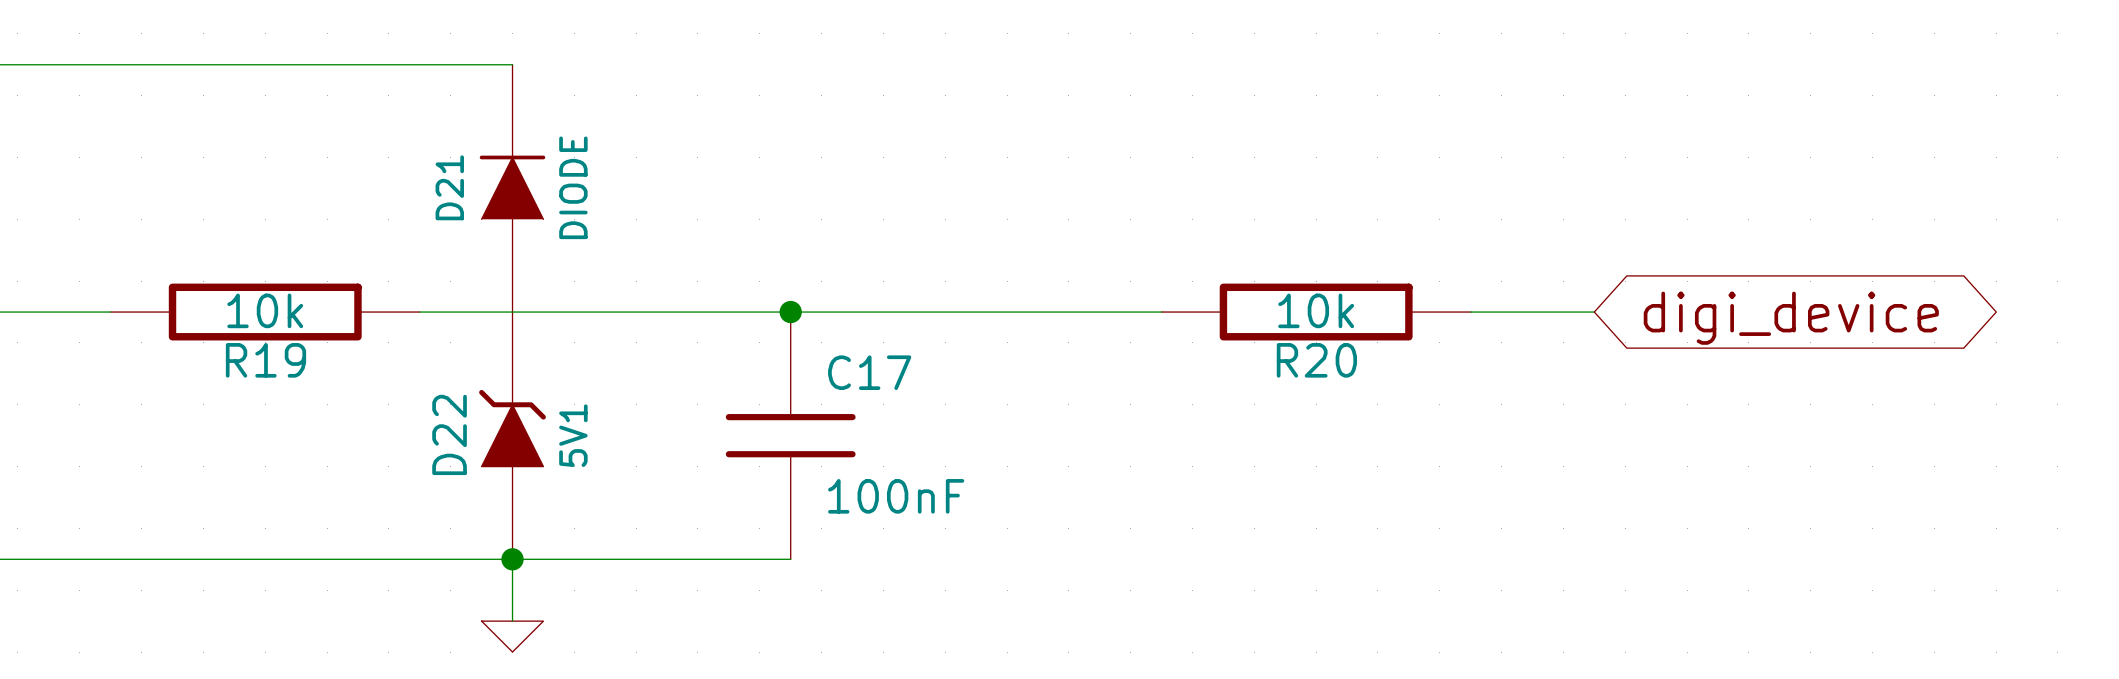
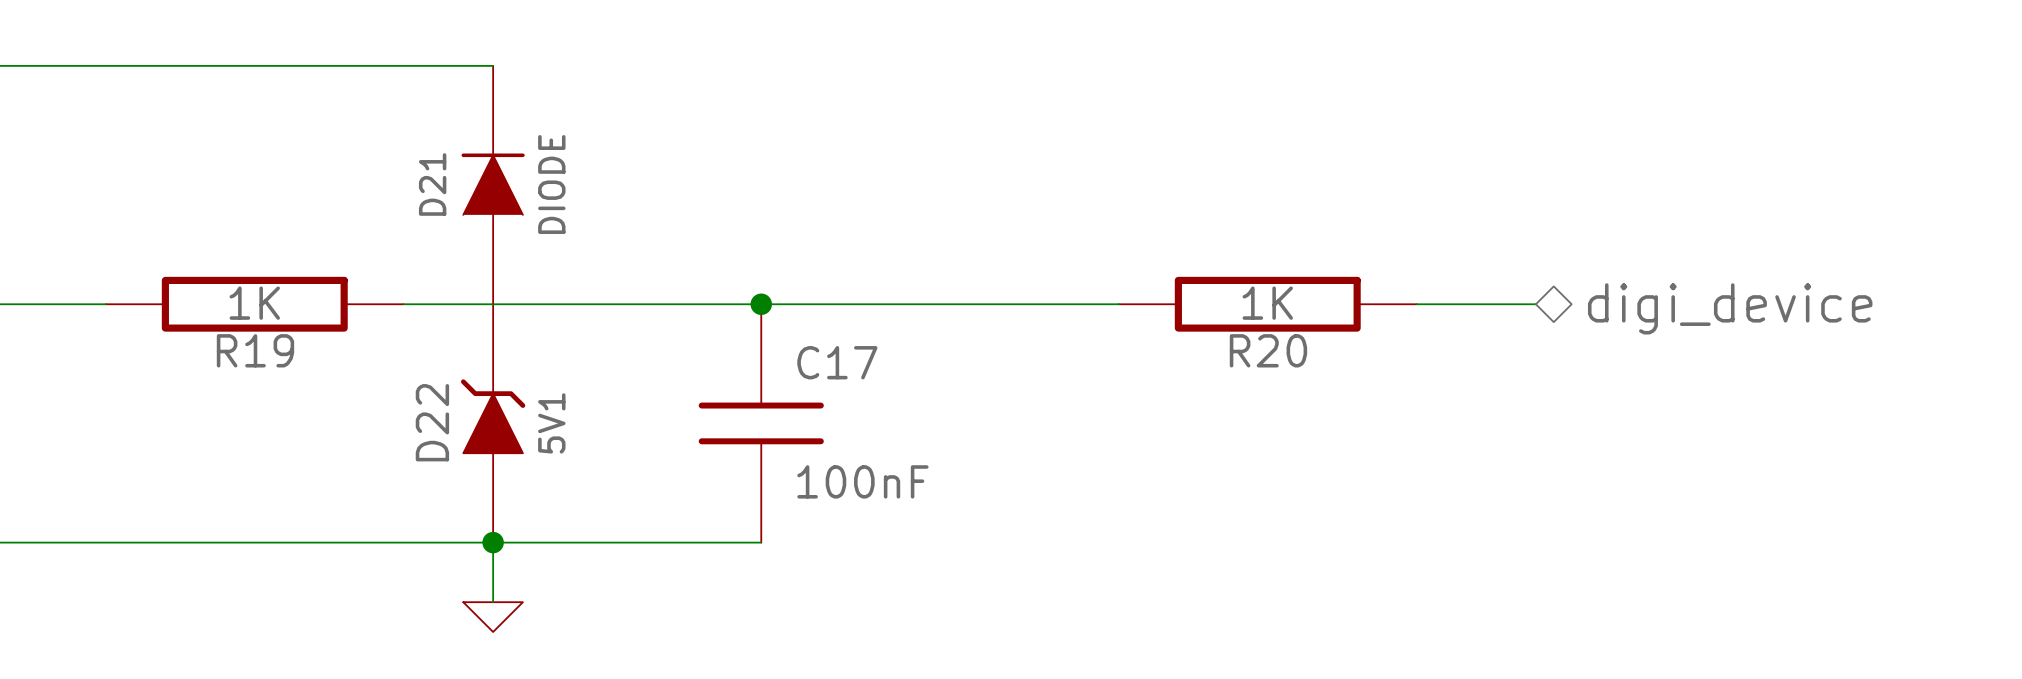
R19 value: 10k (265, 310) -> 1K (254, 303)
R20 value: 10k (1316, 310) -> 1K (1267, 303)
hierarchical label: none -> digi_device (1730, 308)
global label: digi_device (1791, 318) -> none

